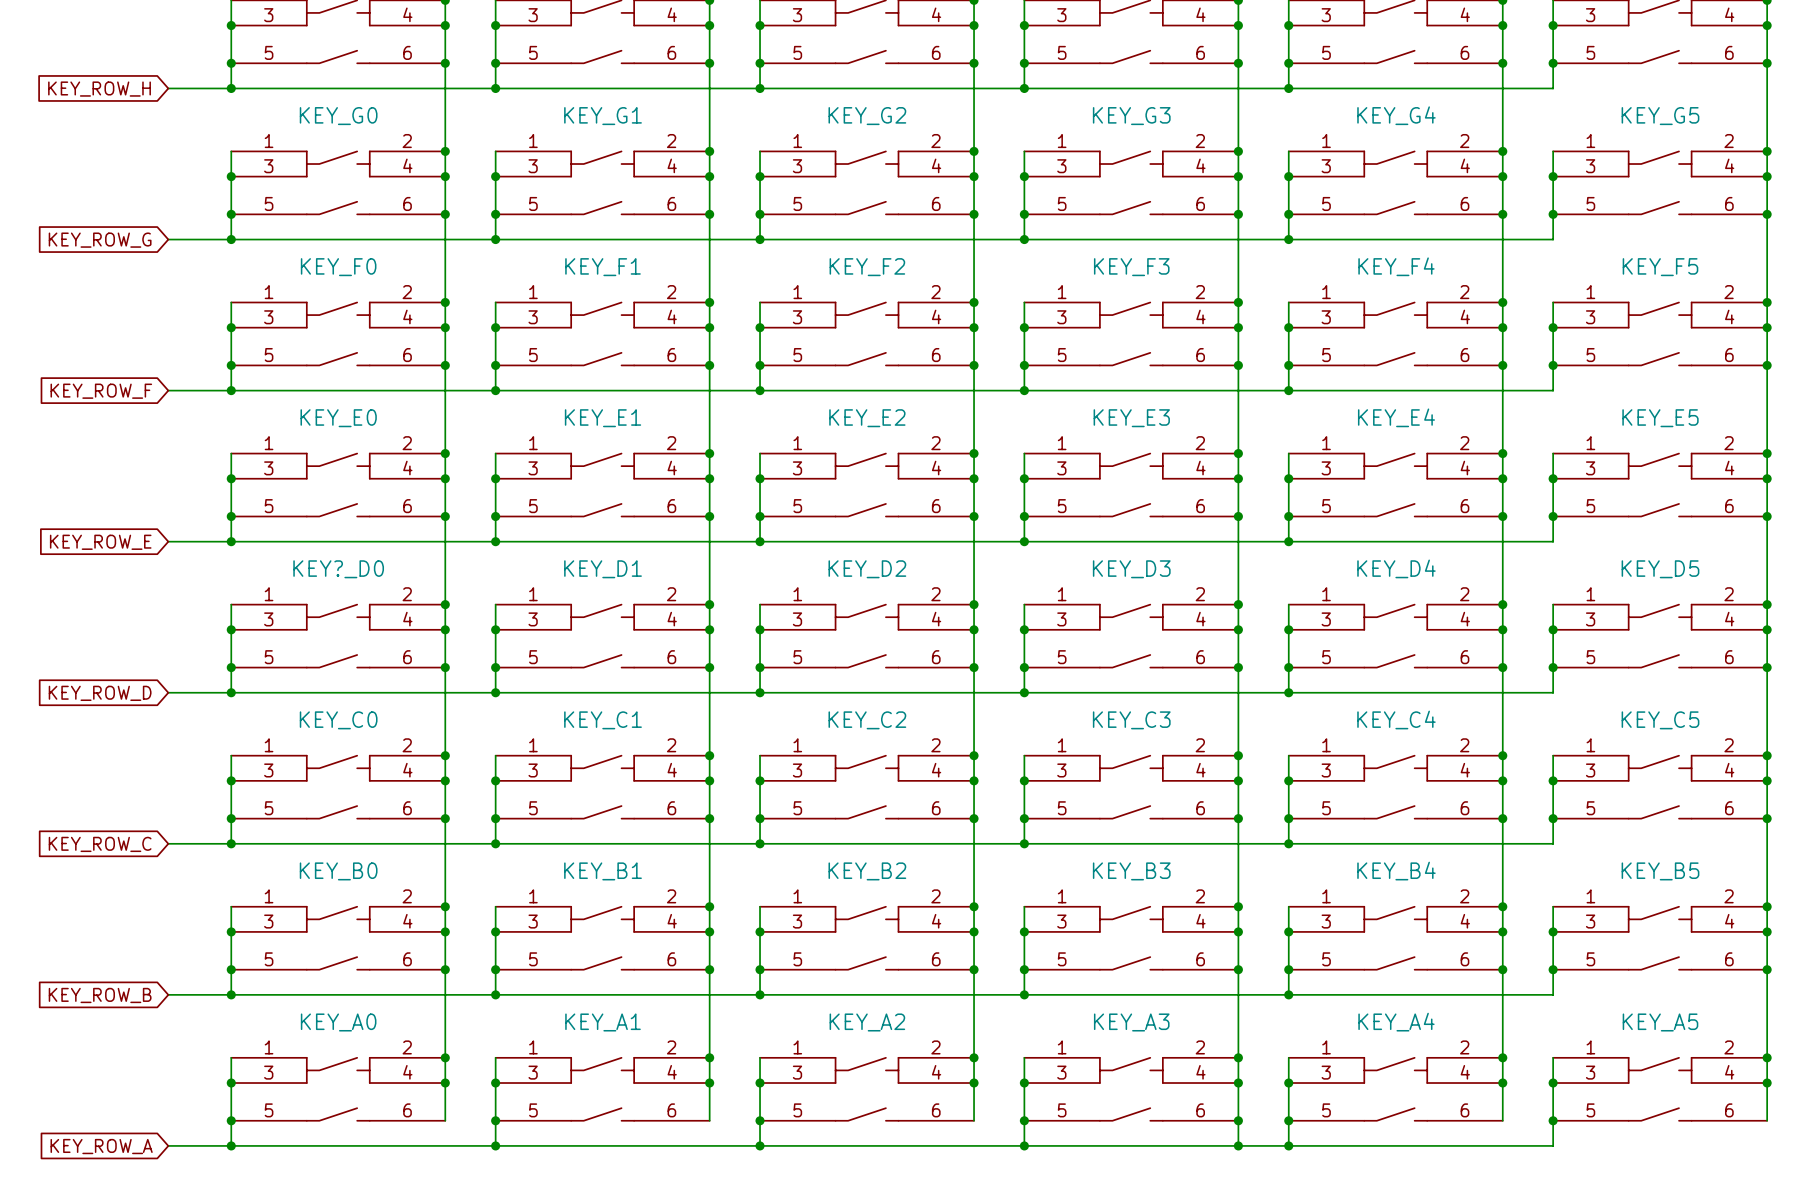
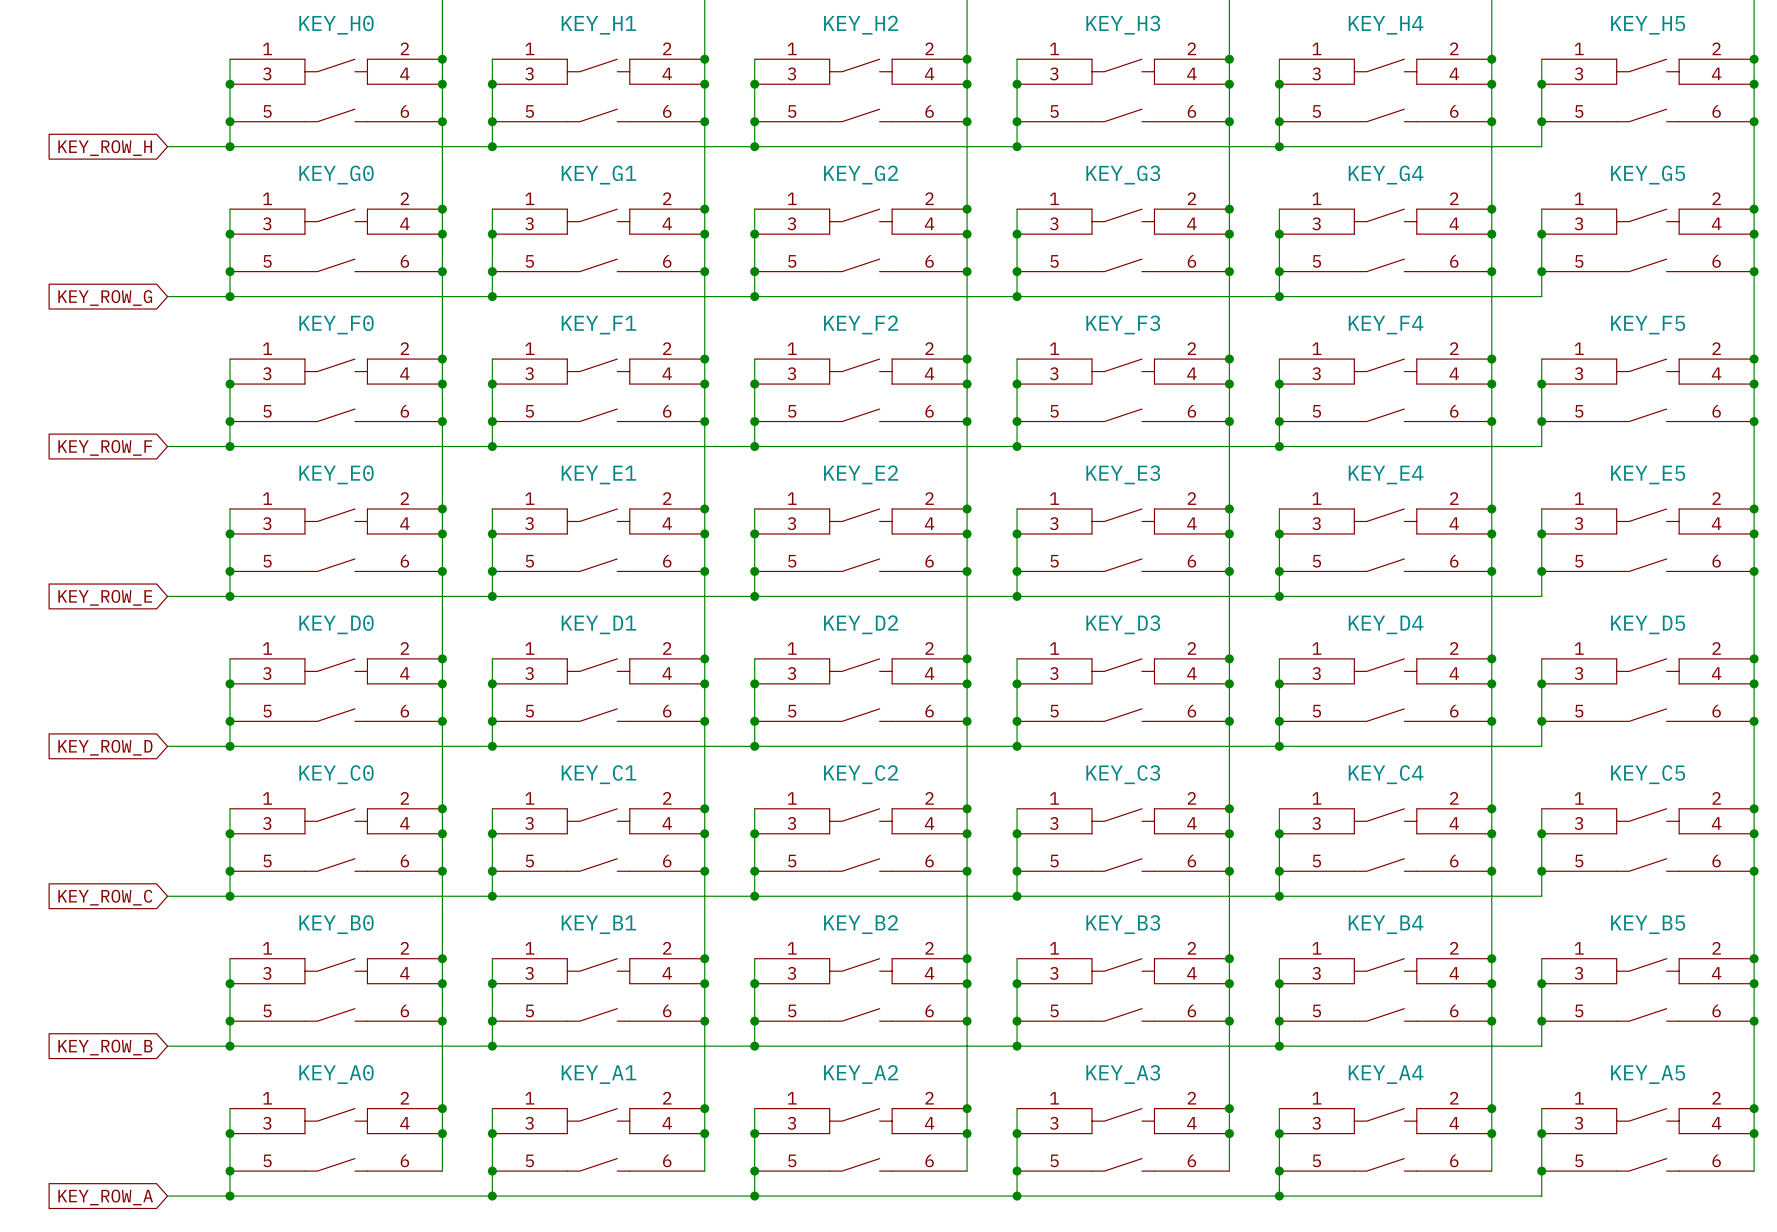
KEY?_D0 name: KEY?_D0 (338, 569) -> KEY_D0 (336, 624)
wire: (1238, 1120) (1238, 1145) -> none
junction: (1238, 1120) -> none
junction: (1238, 1145) -> none

